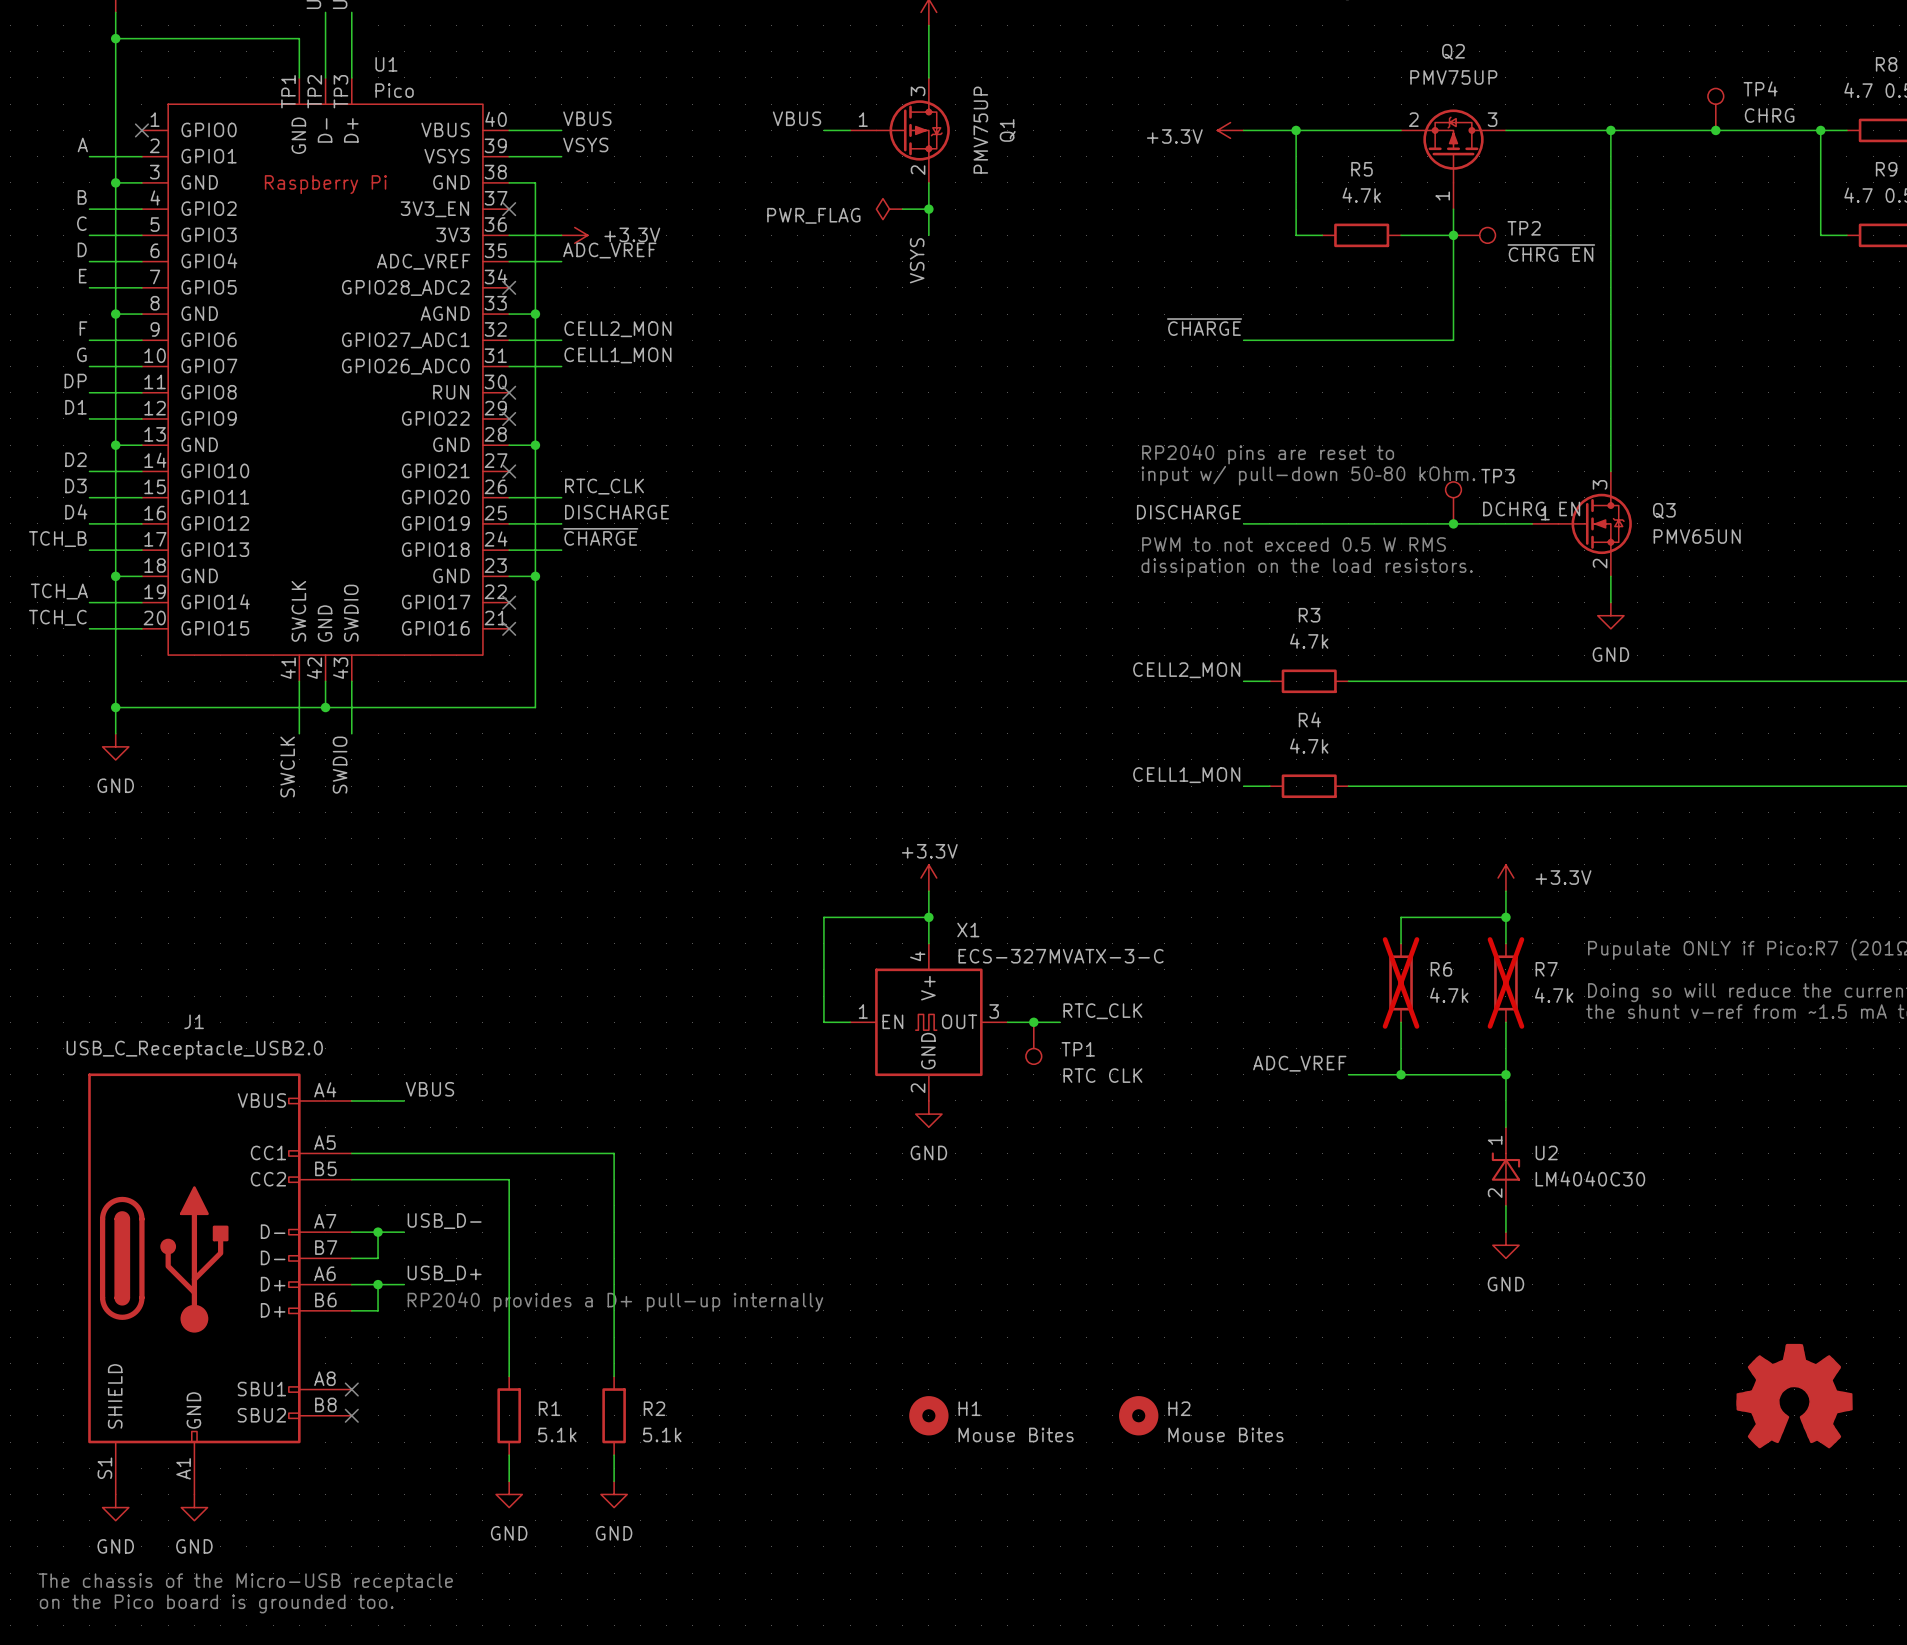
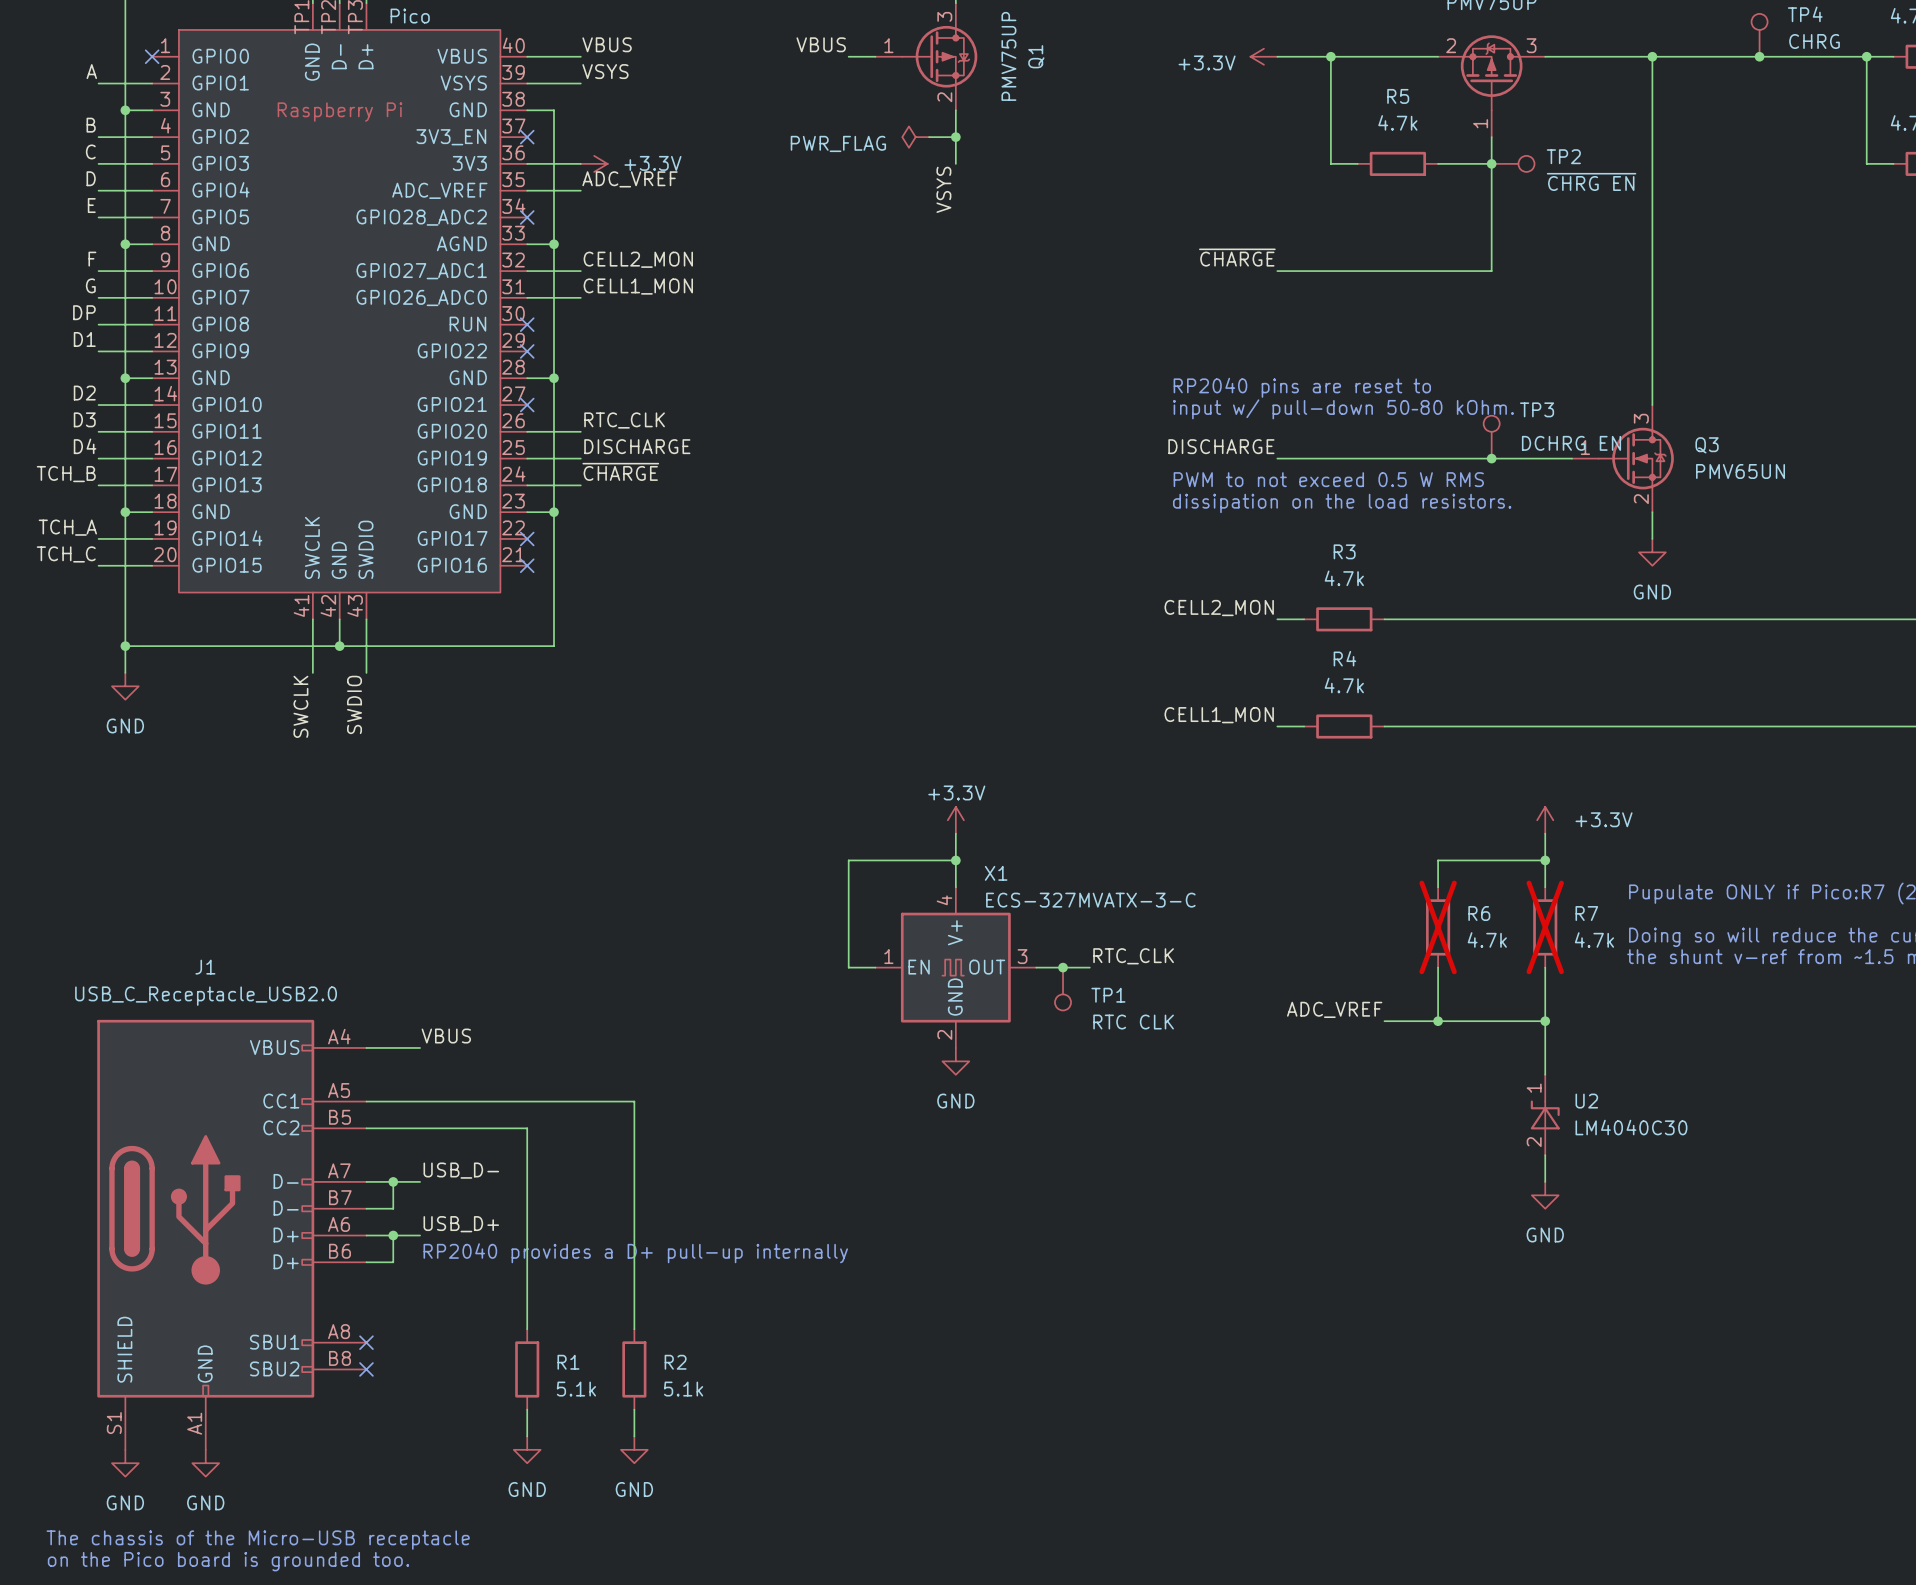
part: (1794, 1396) -> none
H1: Mouse Bites (928, 1415) -> none
H2: Mouse Bites (1138, 1415) -> none

